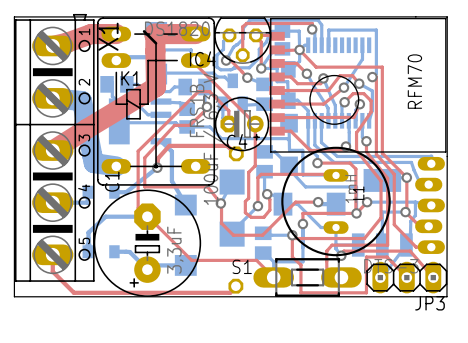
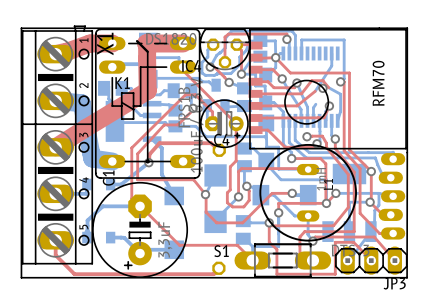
via: (359, 83) -> none
via: none -> (322, 88)
via: (343, 87) -> none
top track: (344, 102) (353, 93) (363, 93) (371, 100) (371, 112) (356, 132) (356, 145) -> (307, 136) (322, 136) (326, 143)
via: (344, 102) -> none
via: none -> (307, 136)

